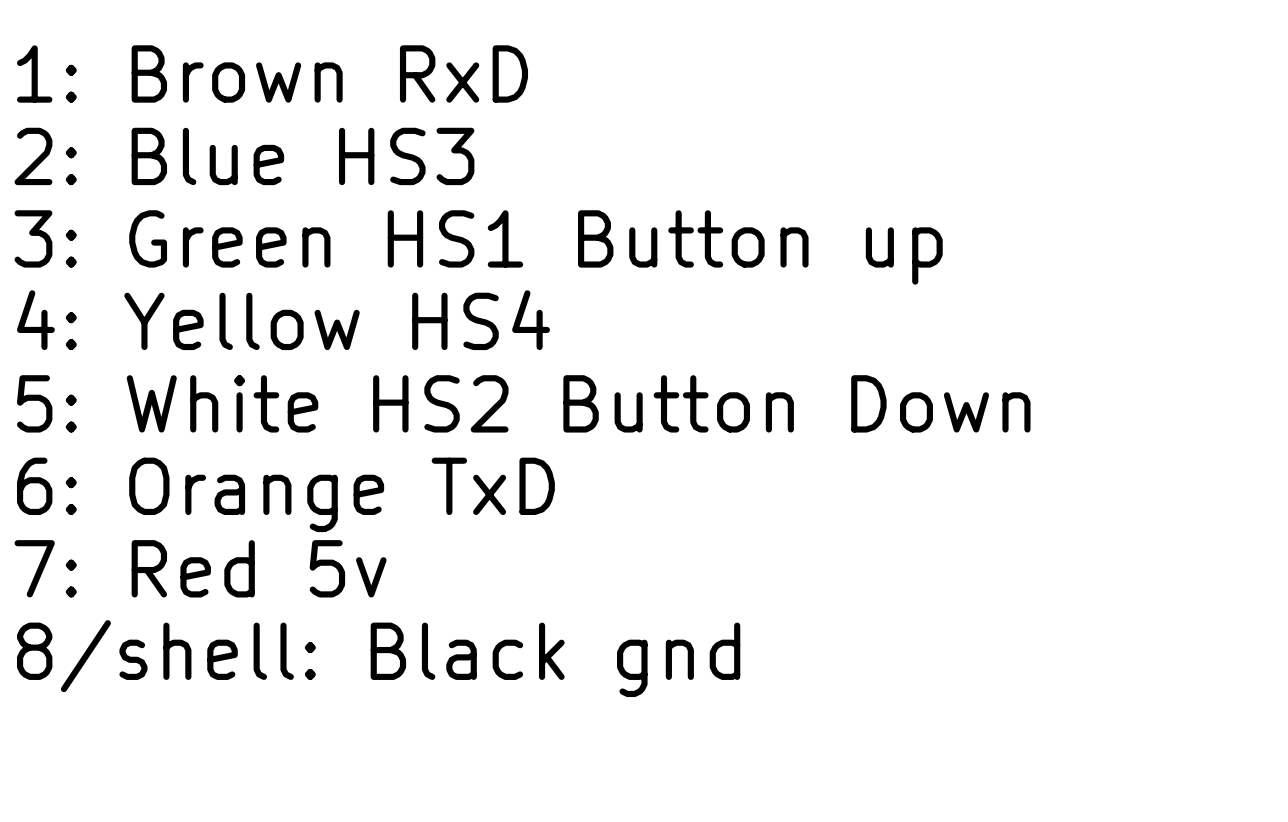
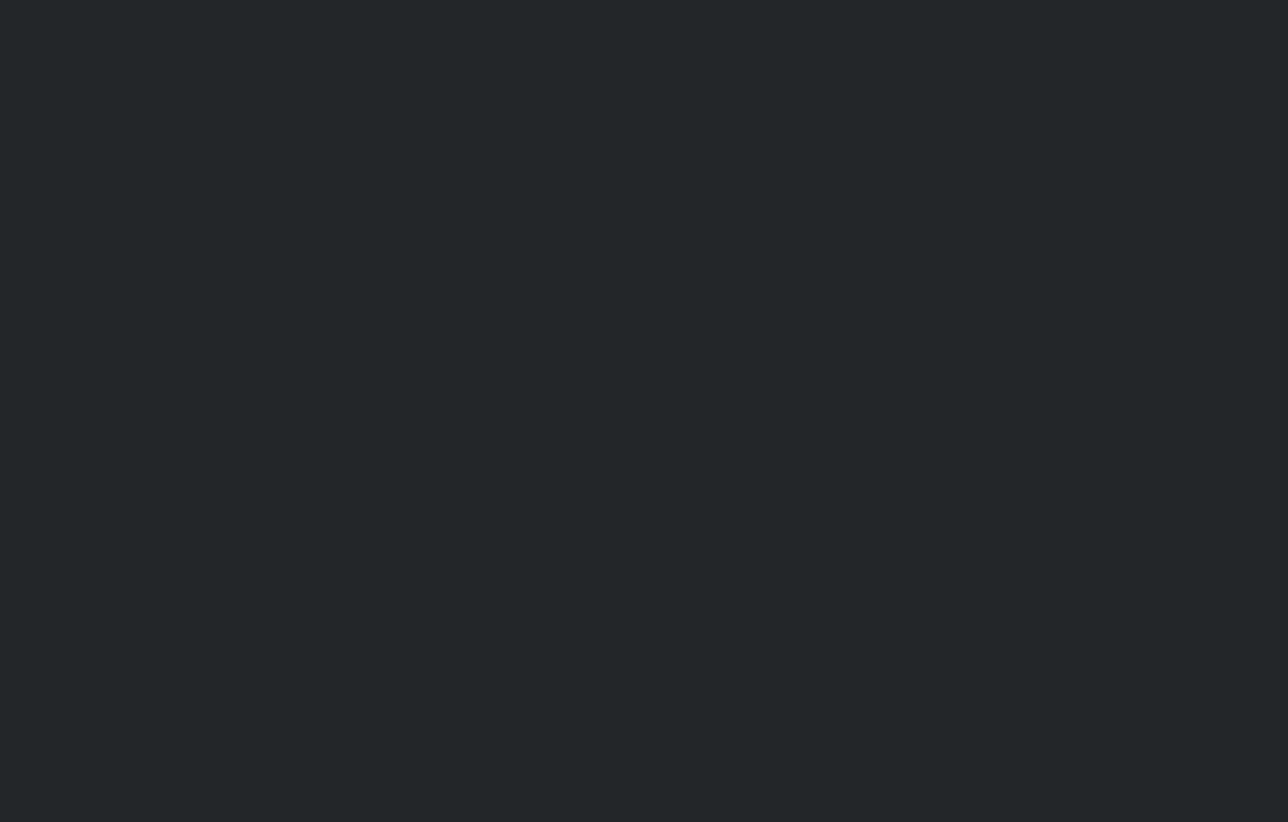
text: 1: Brown RxD (272, 73) -> none
text: 2: Blue HS3 (244, 156) -> none
text: 3: Green HS1 Button up (478, 247) -> none
text: 4: Yellow HS4 (283, 320) -> none
text: 5: White HS2 Button Down (523, 403) -> none
text: 6: Orange TxD (285, 494) -> none
text: 7: Red 5v (200, 568) -> none
text: 8/shell: Black gnd (378, 658) -> none

